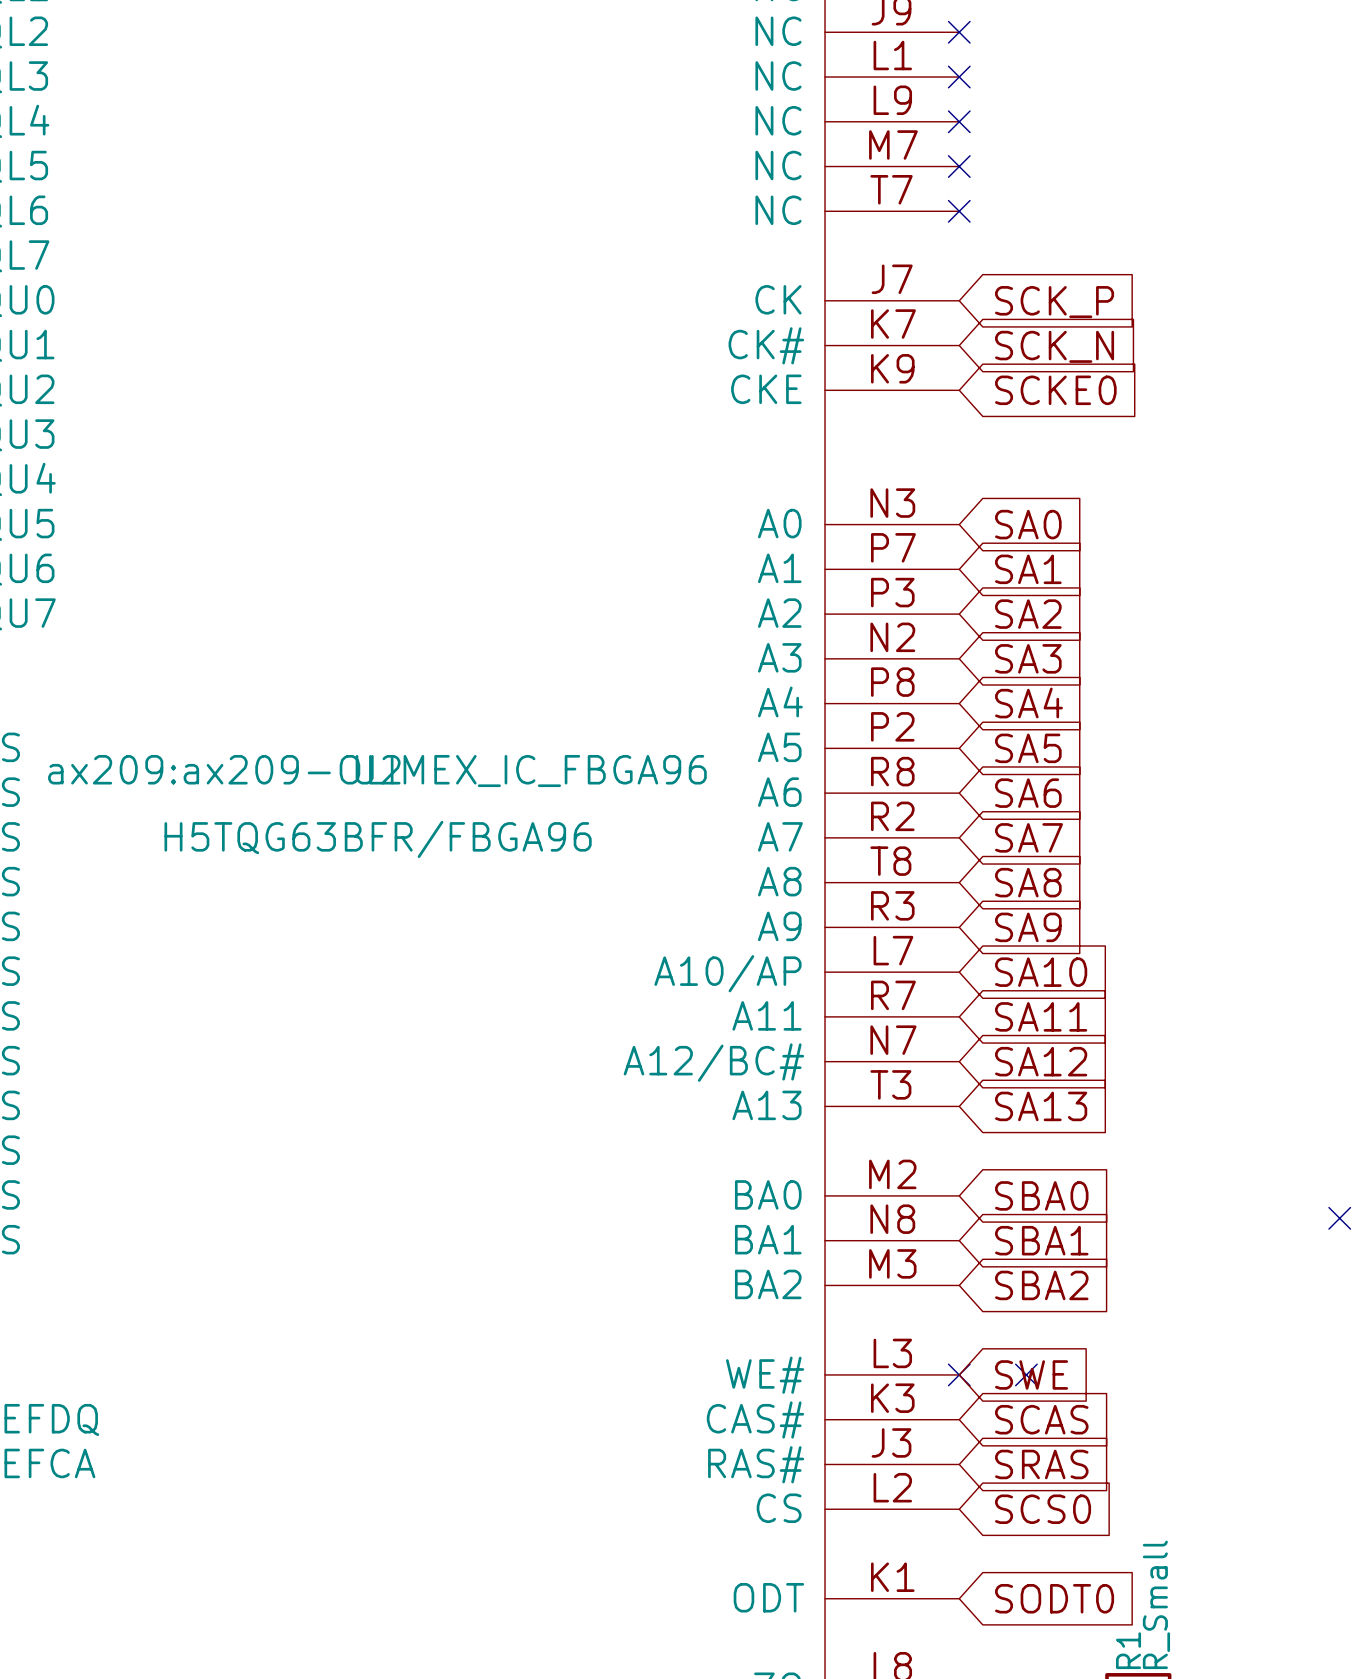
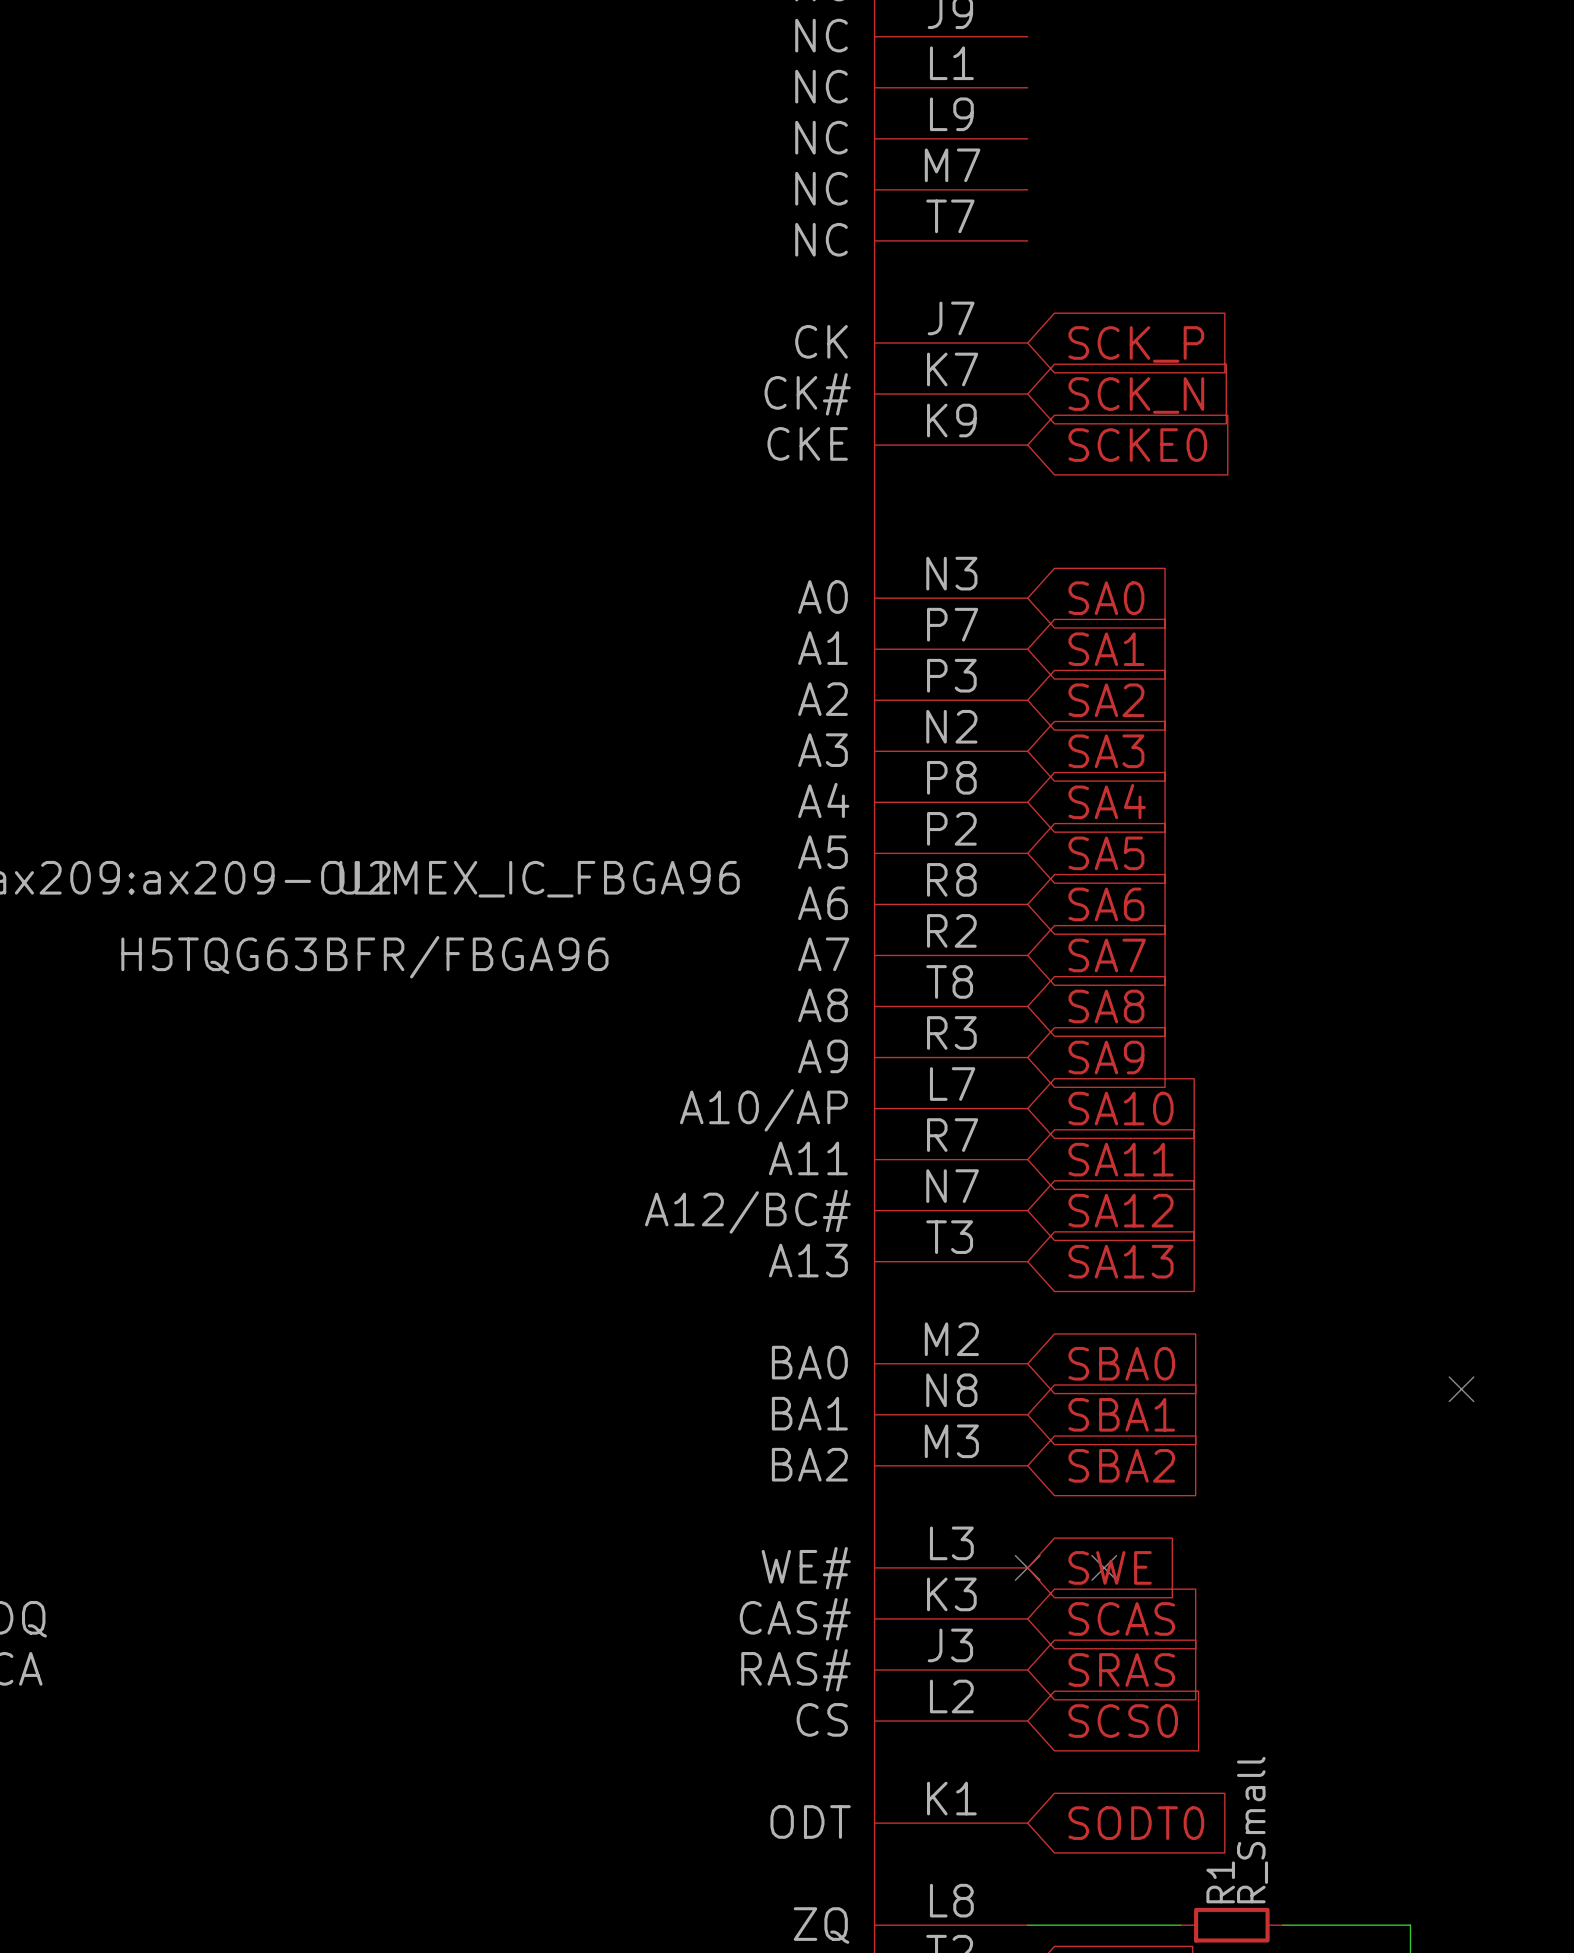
no-connect mark: (959, 32) -> none
no-connect mark: (959, 77) -> none
no-connect mark: (959, 121) -> none
no-connect mark: (959, 166) -> none
no-connect mark: (959, 211) -> none

